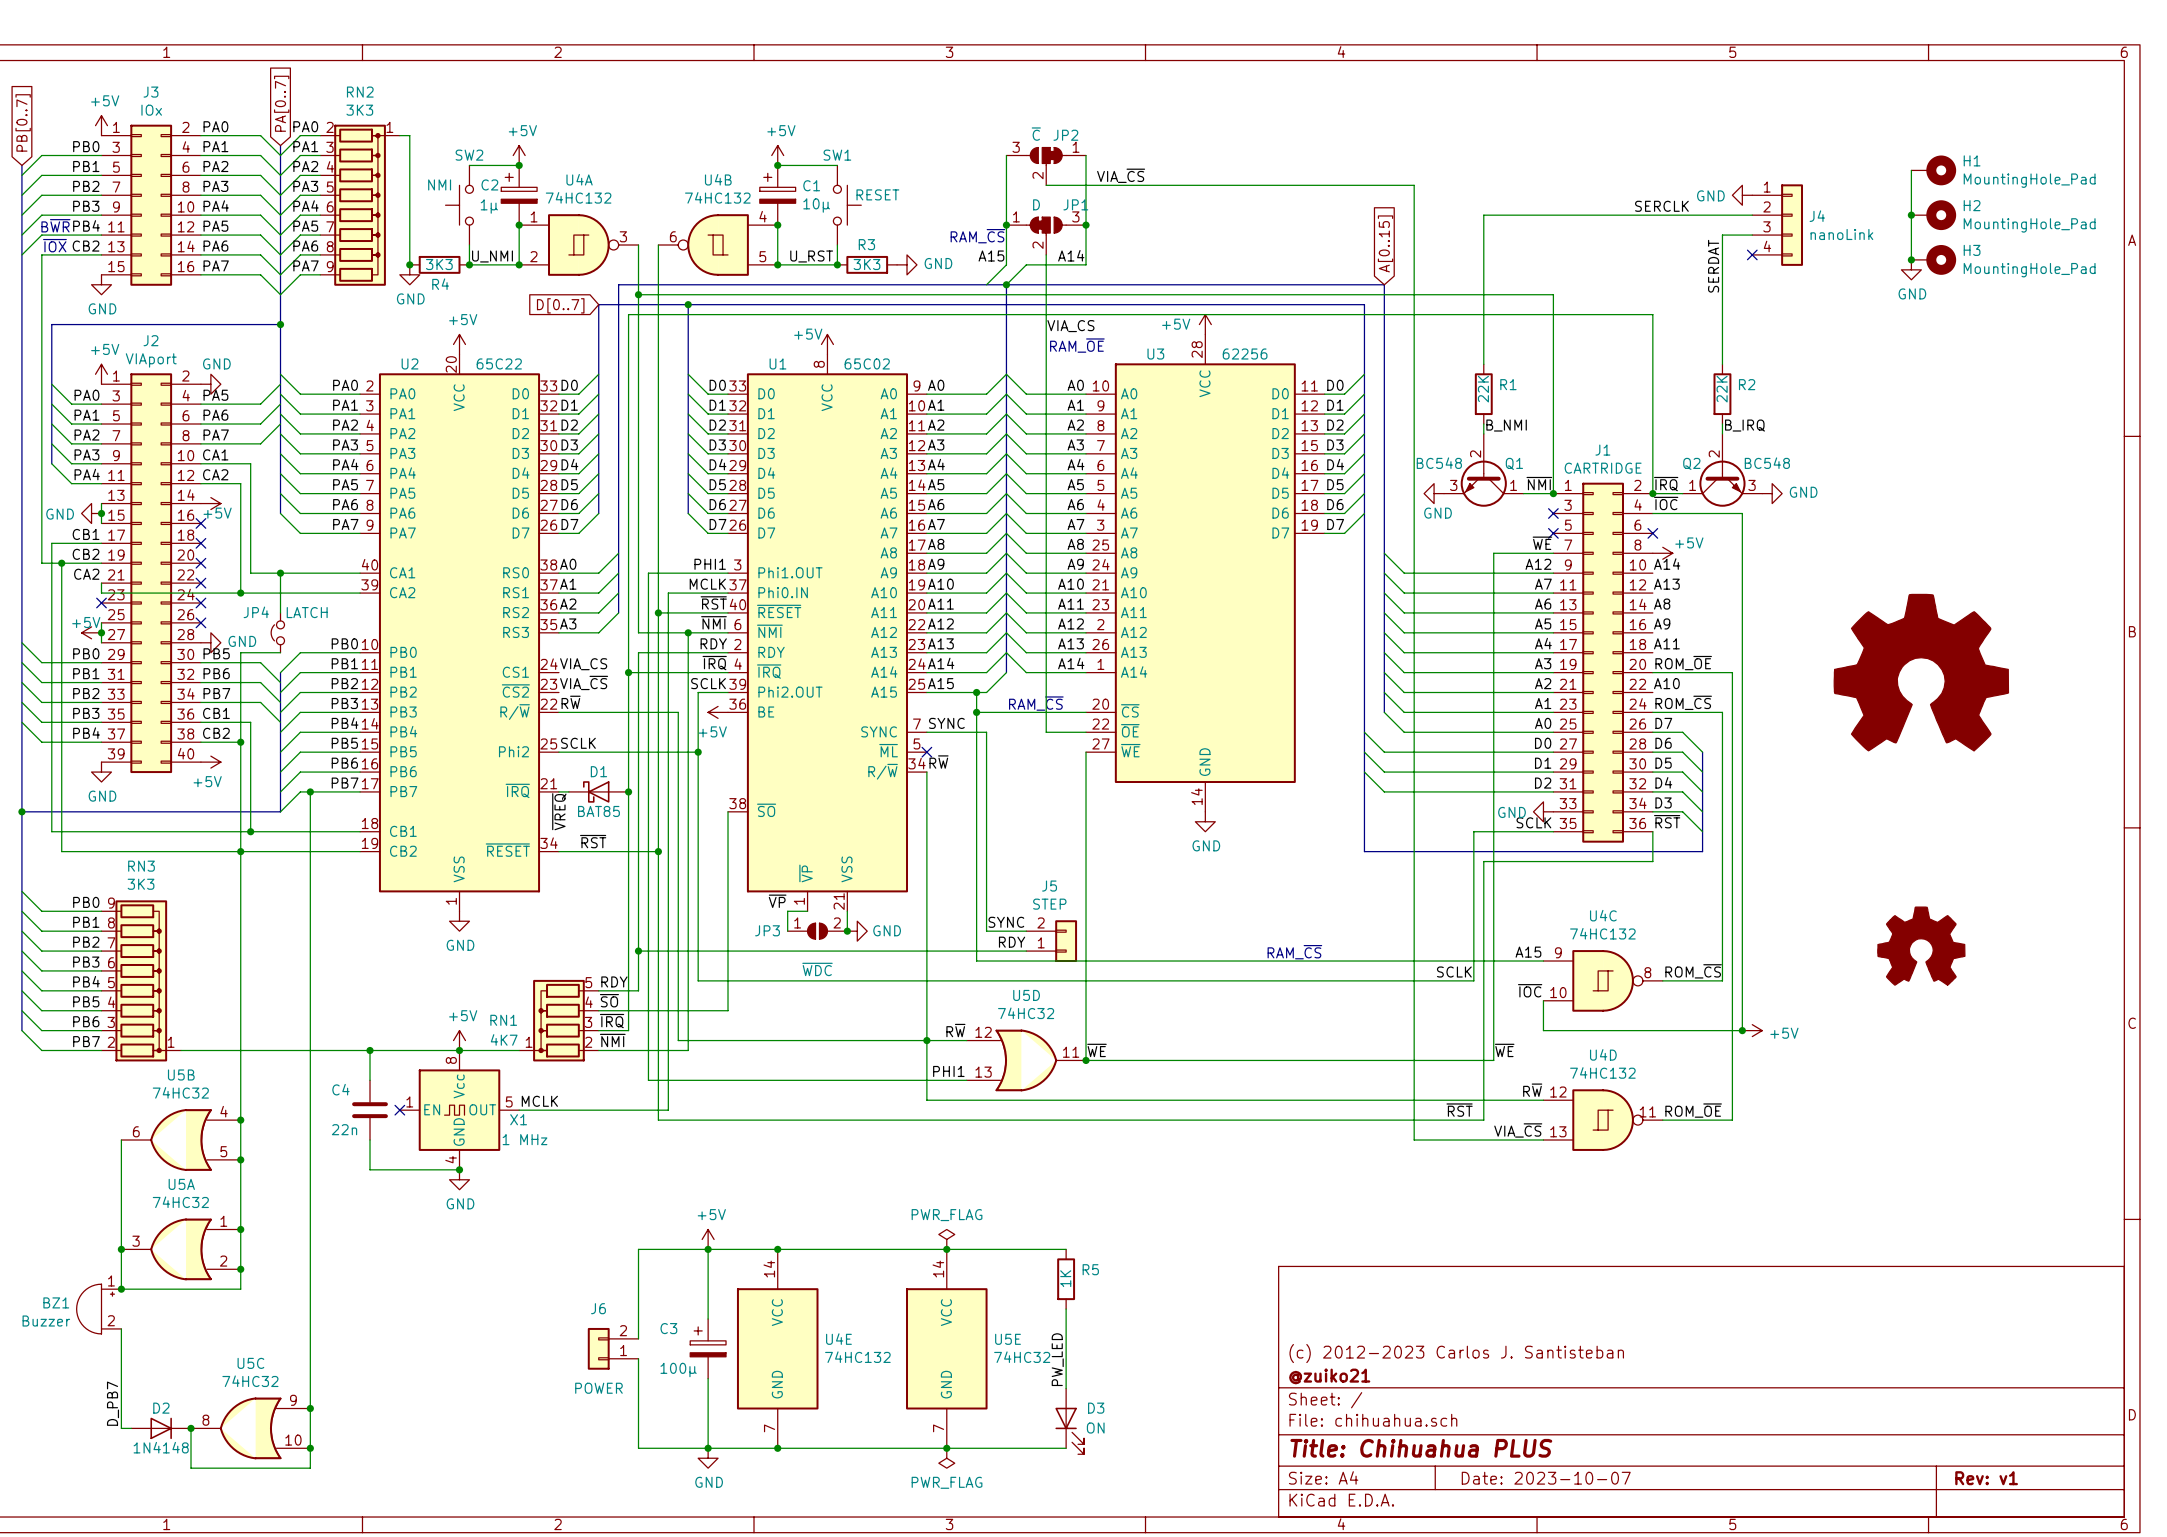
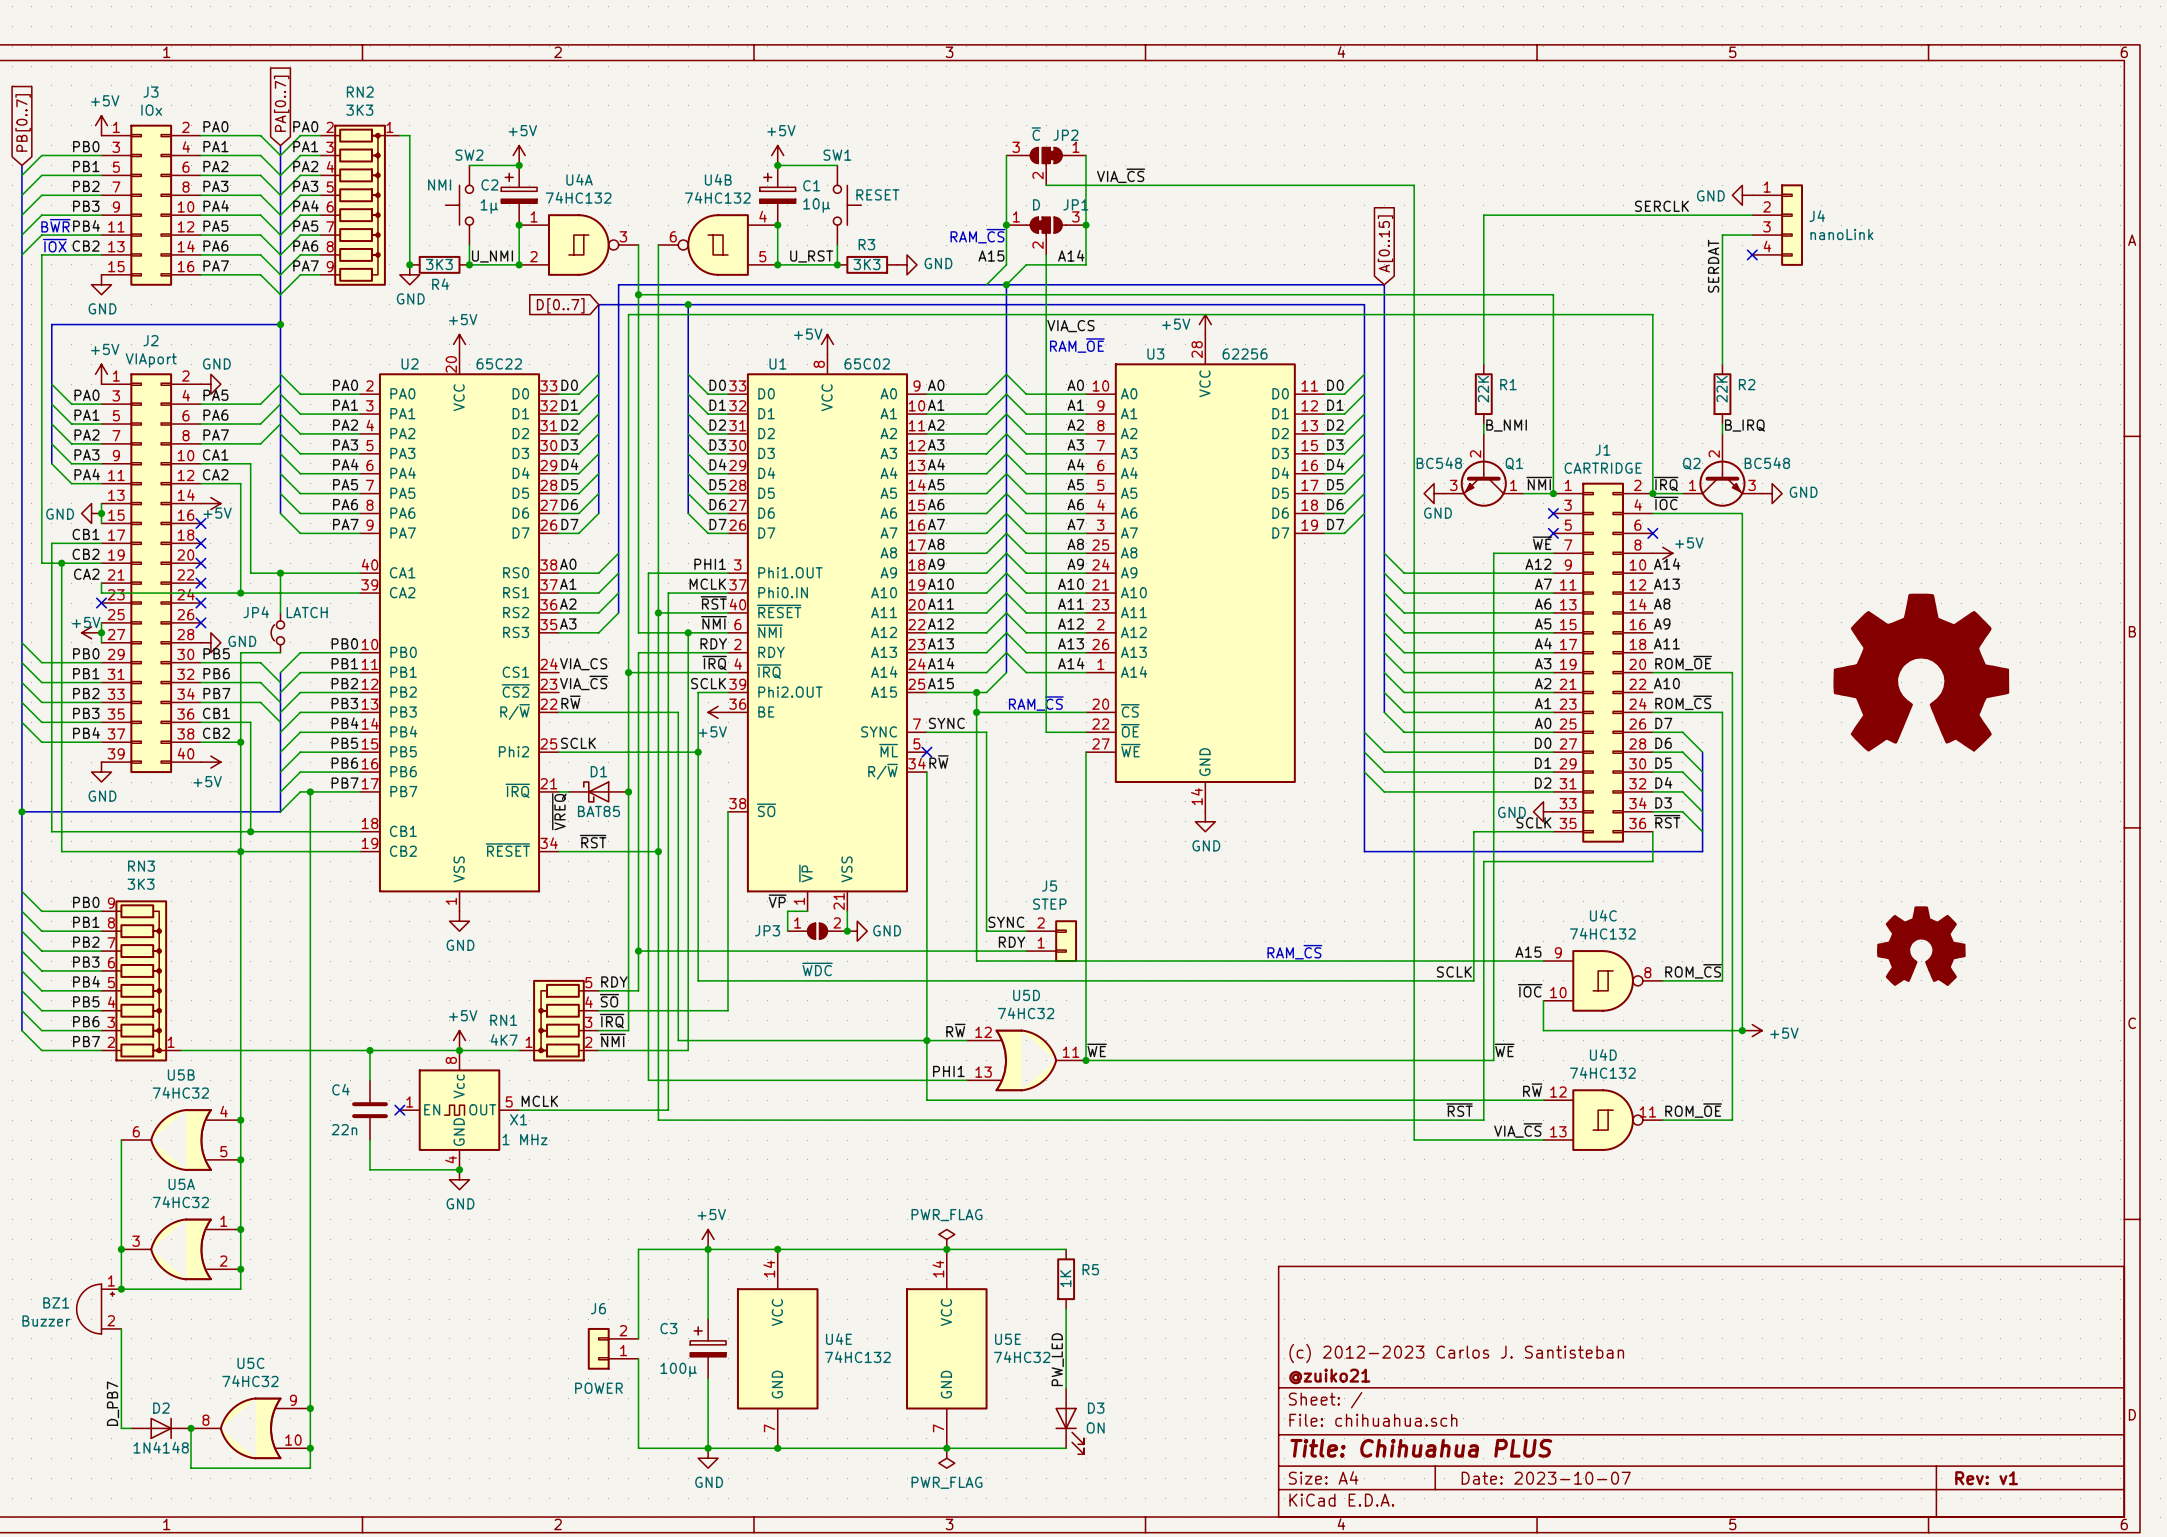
wire: (1911, 170) (1911, 259) -> none
H1: MountingHole_Pad (1933, 170) -> none
junction: (1911, 215) -> none
H2: MountingHole_Pad (1933, 215) -> none
junction: (1911, 259) -> none
H3: MountingHole_Pad (1933, 259) -> none
power symbol: GND (1911, 269) -> none

